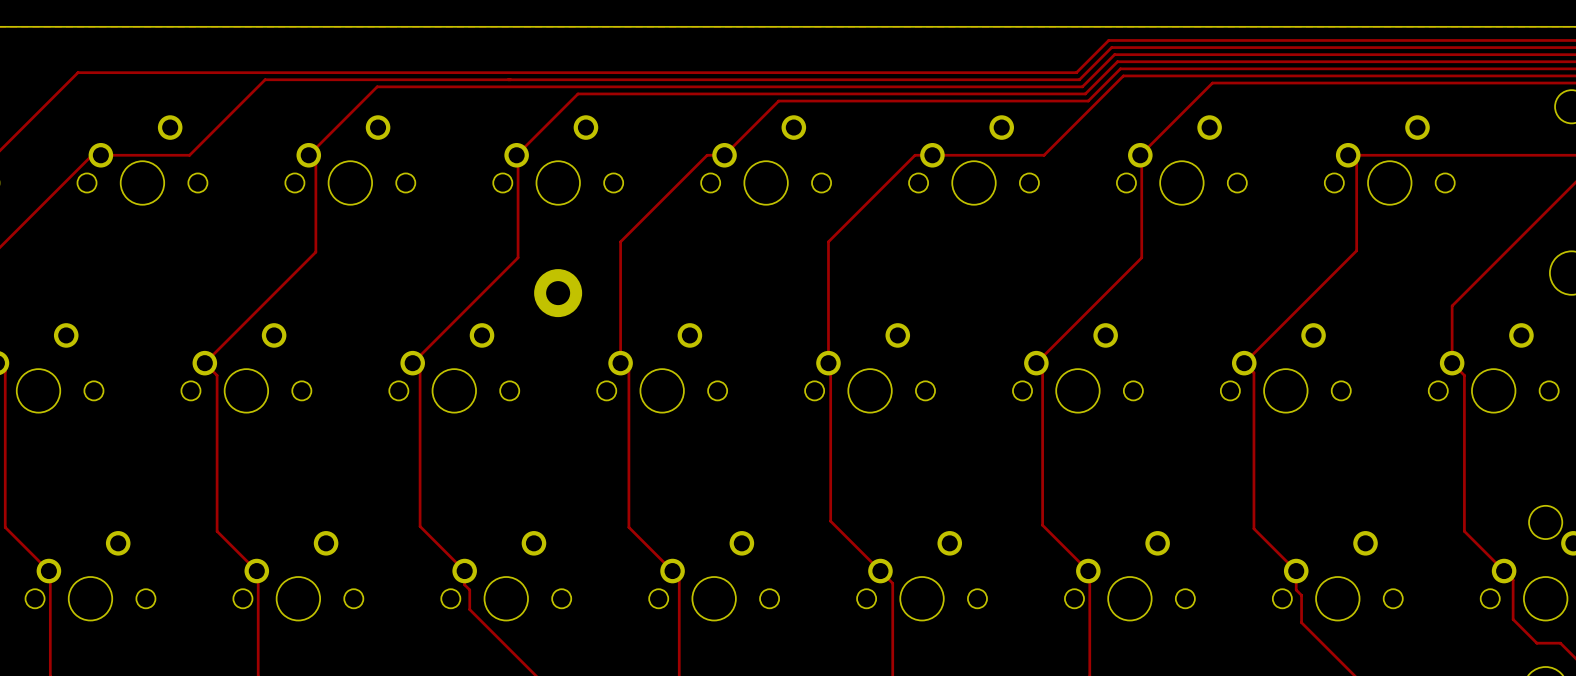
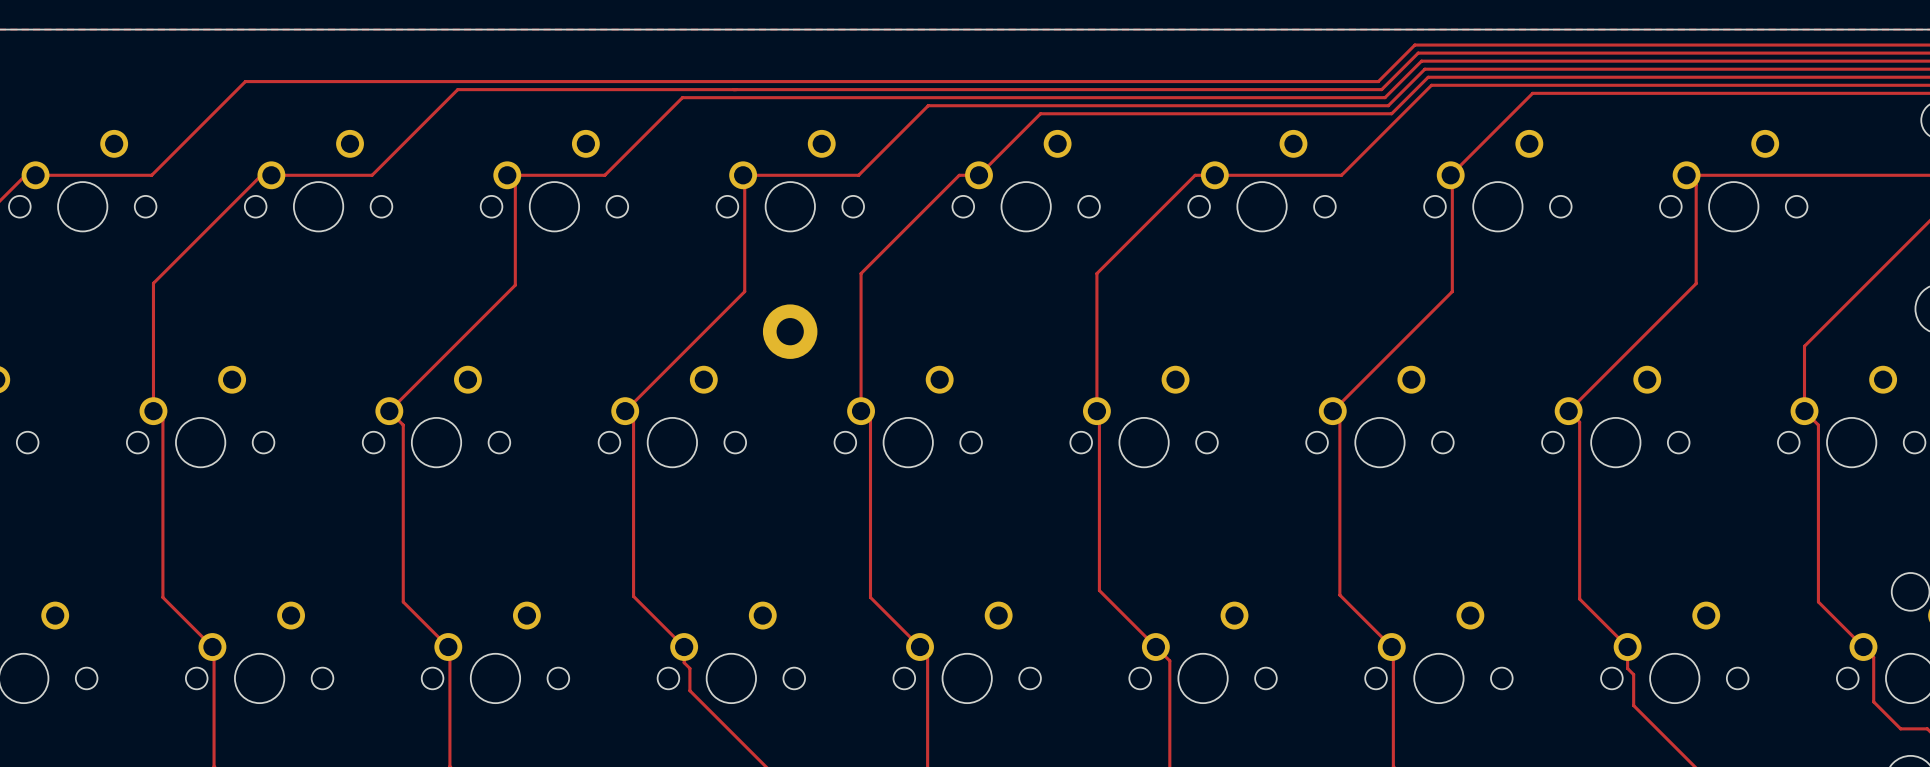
track: (463, 86) (377, 86) (308, 155) -> (682, 97) (604, 175) (507, 175)
track: (679, 93) (577, 93) (516, 155) -> (928, 105) (858, 175) (743, 175)

